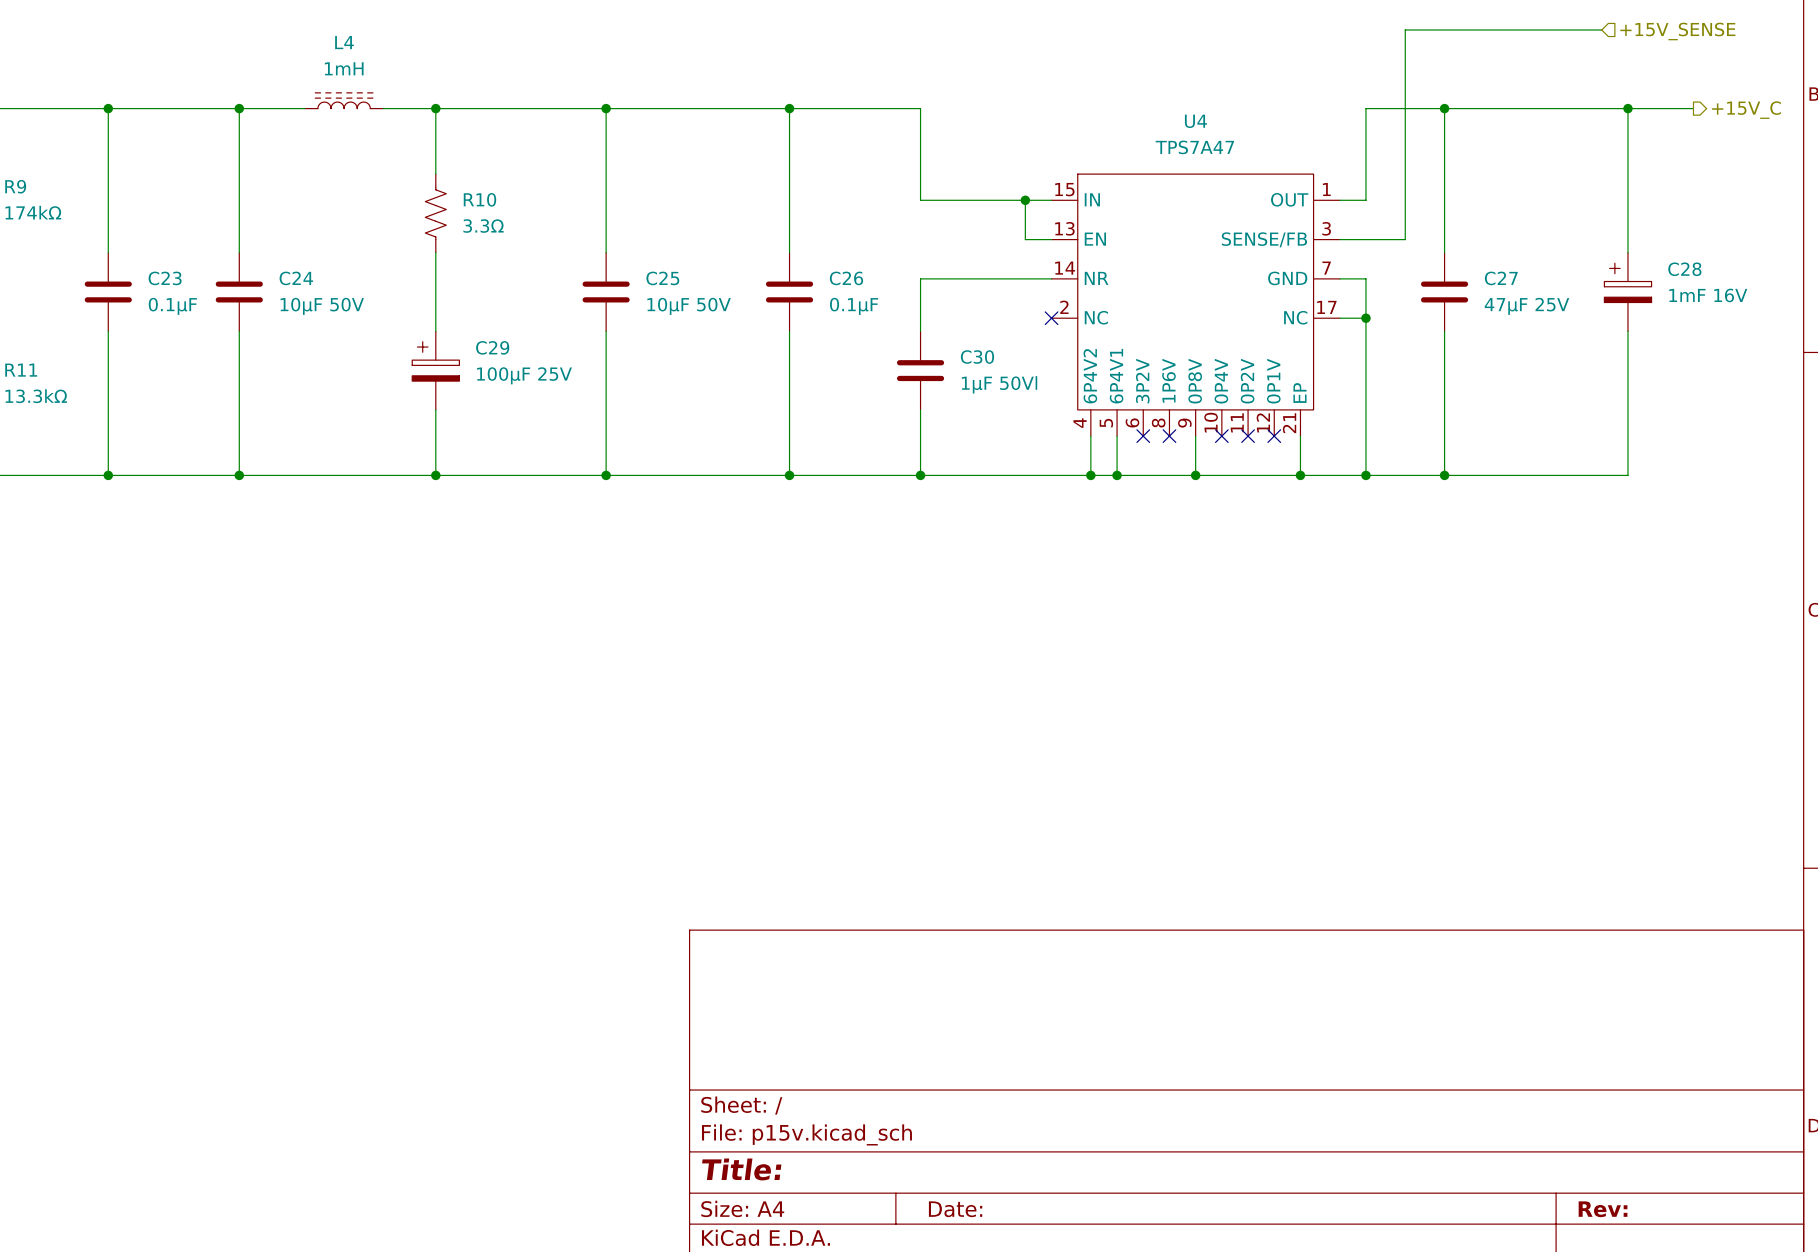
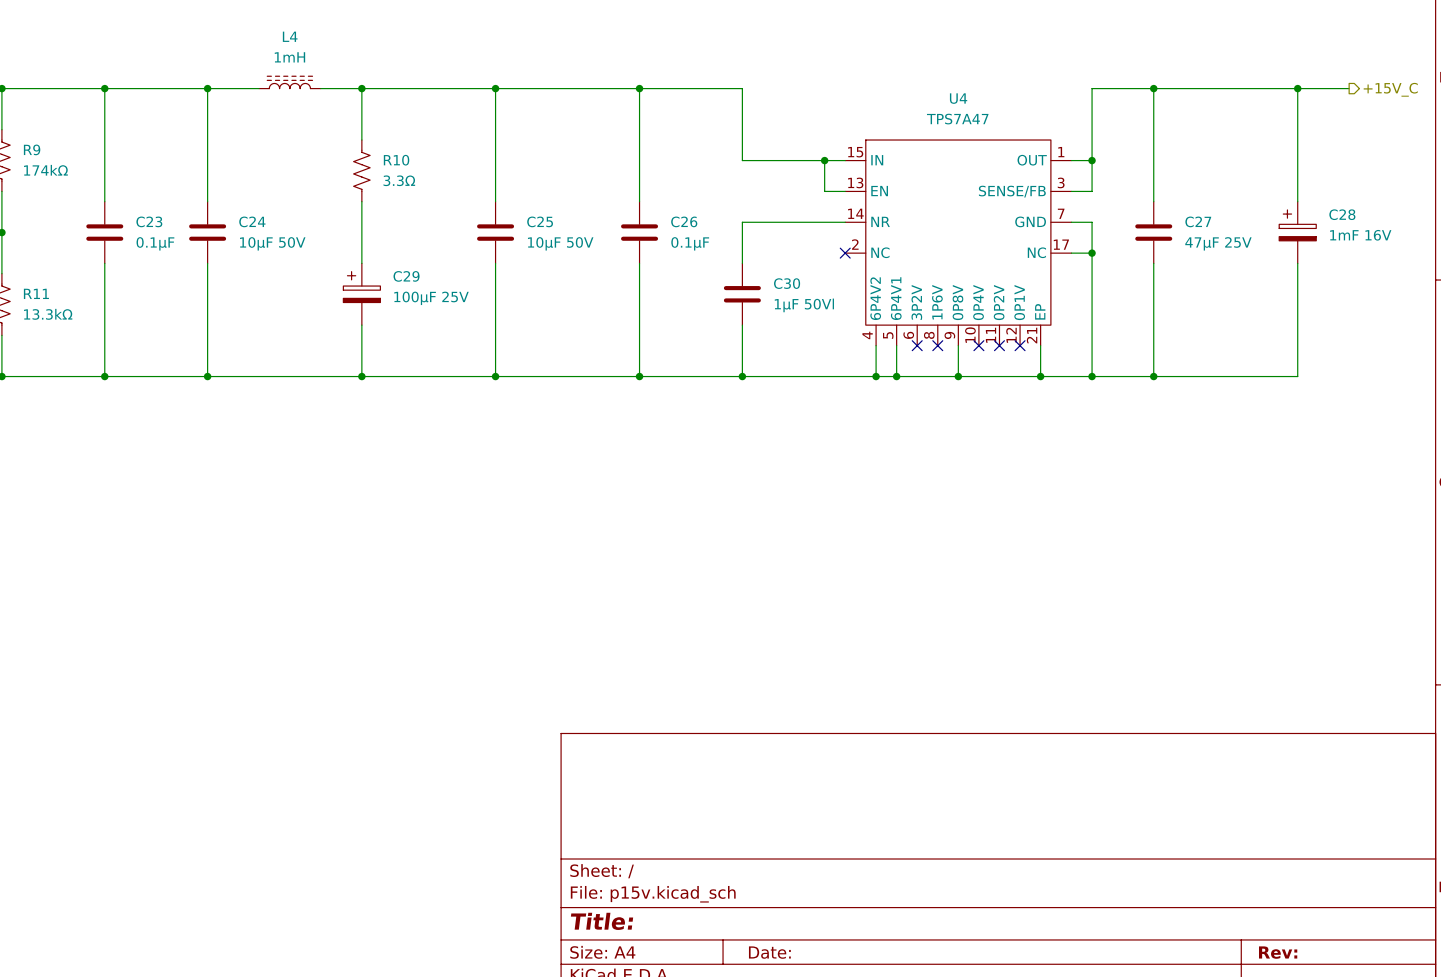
wire: (1601, 29) (1405, 29) (1405, 239) (1365, 239) -> (1092, 160) (1092, 191)
hierarchical label: +15V_SENSE (1677, 31) -> none
junction: none -> (1092, 160)

